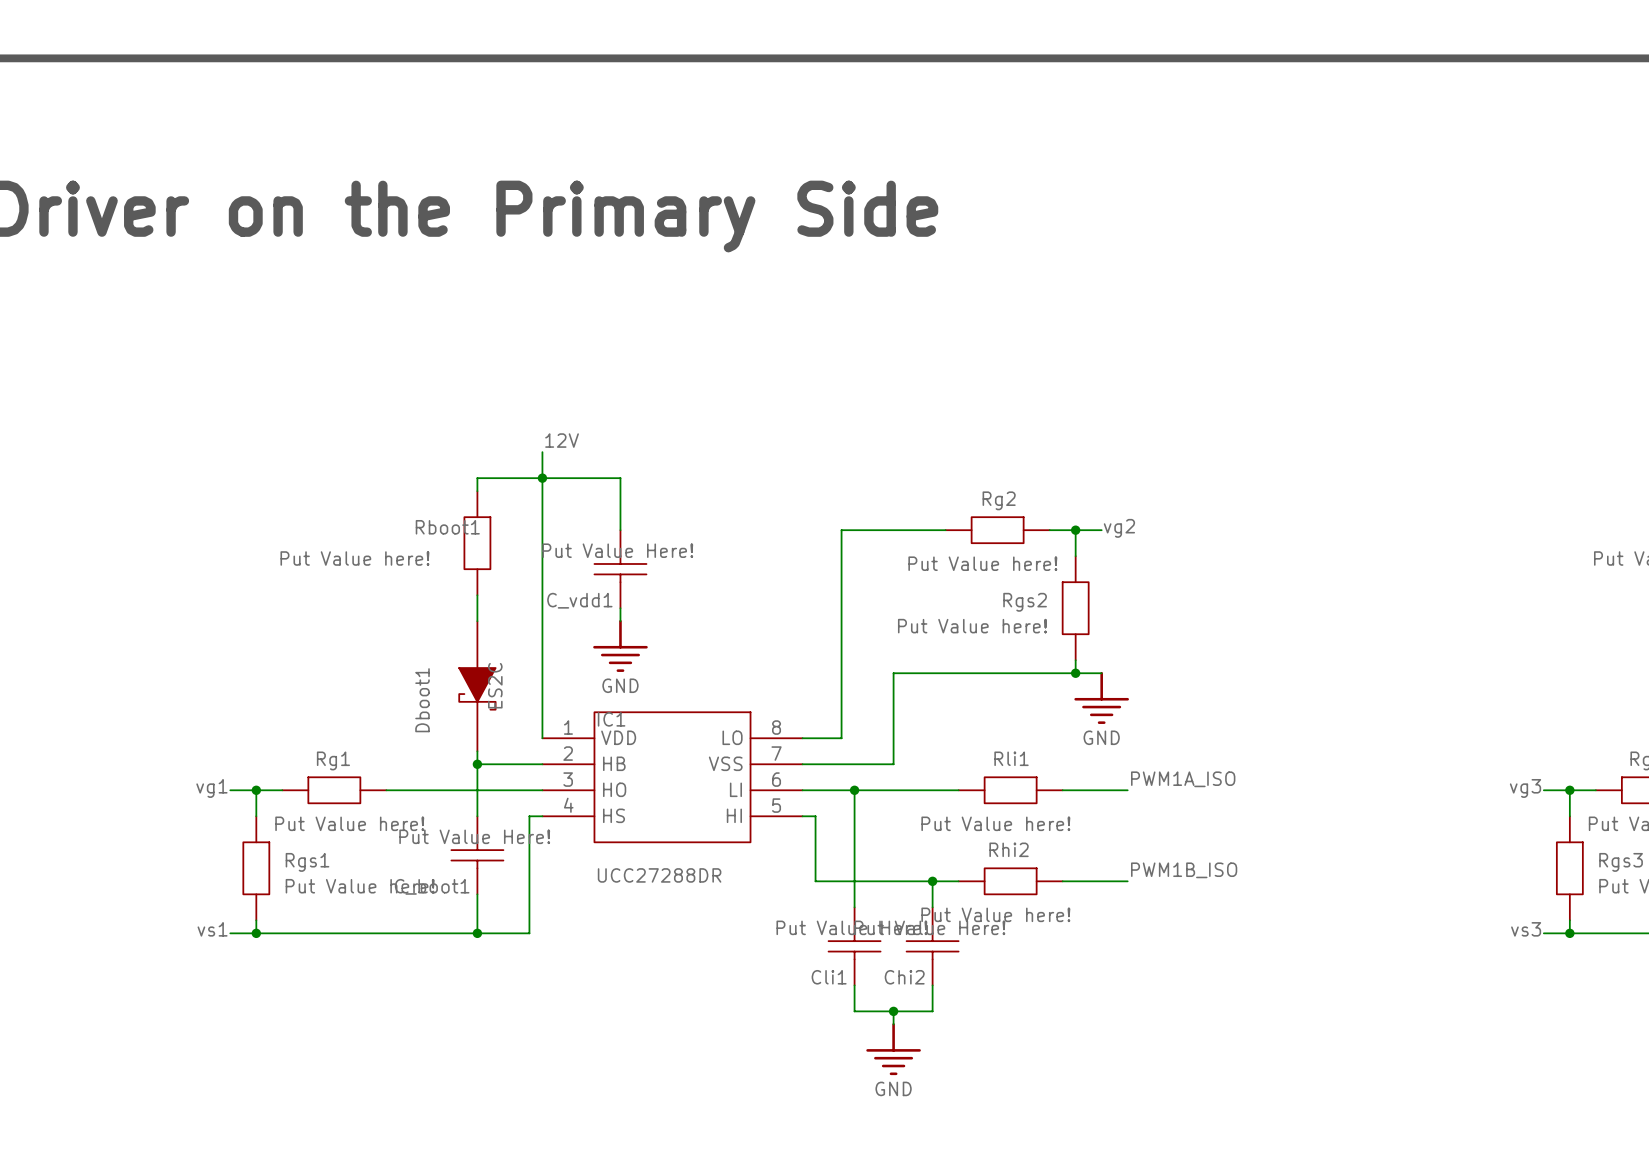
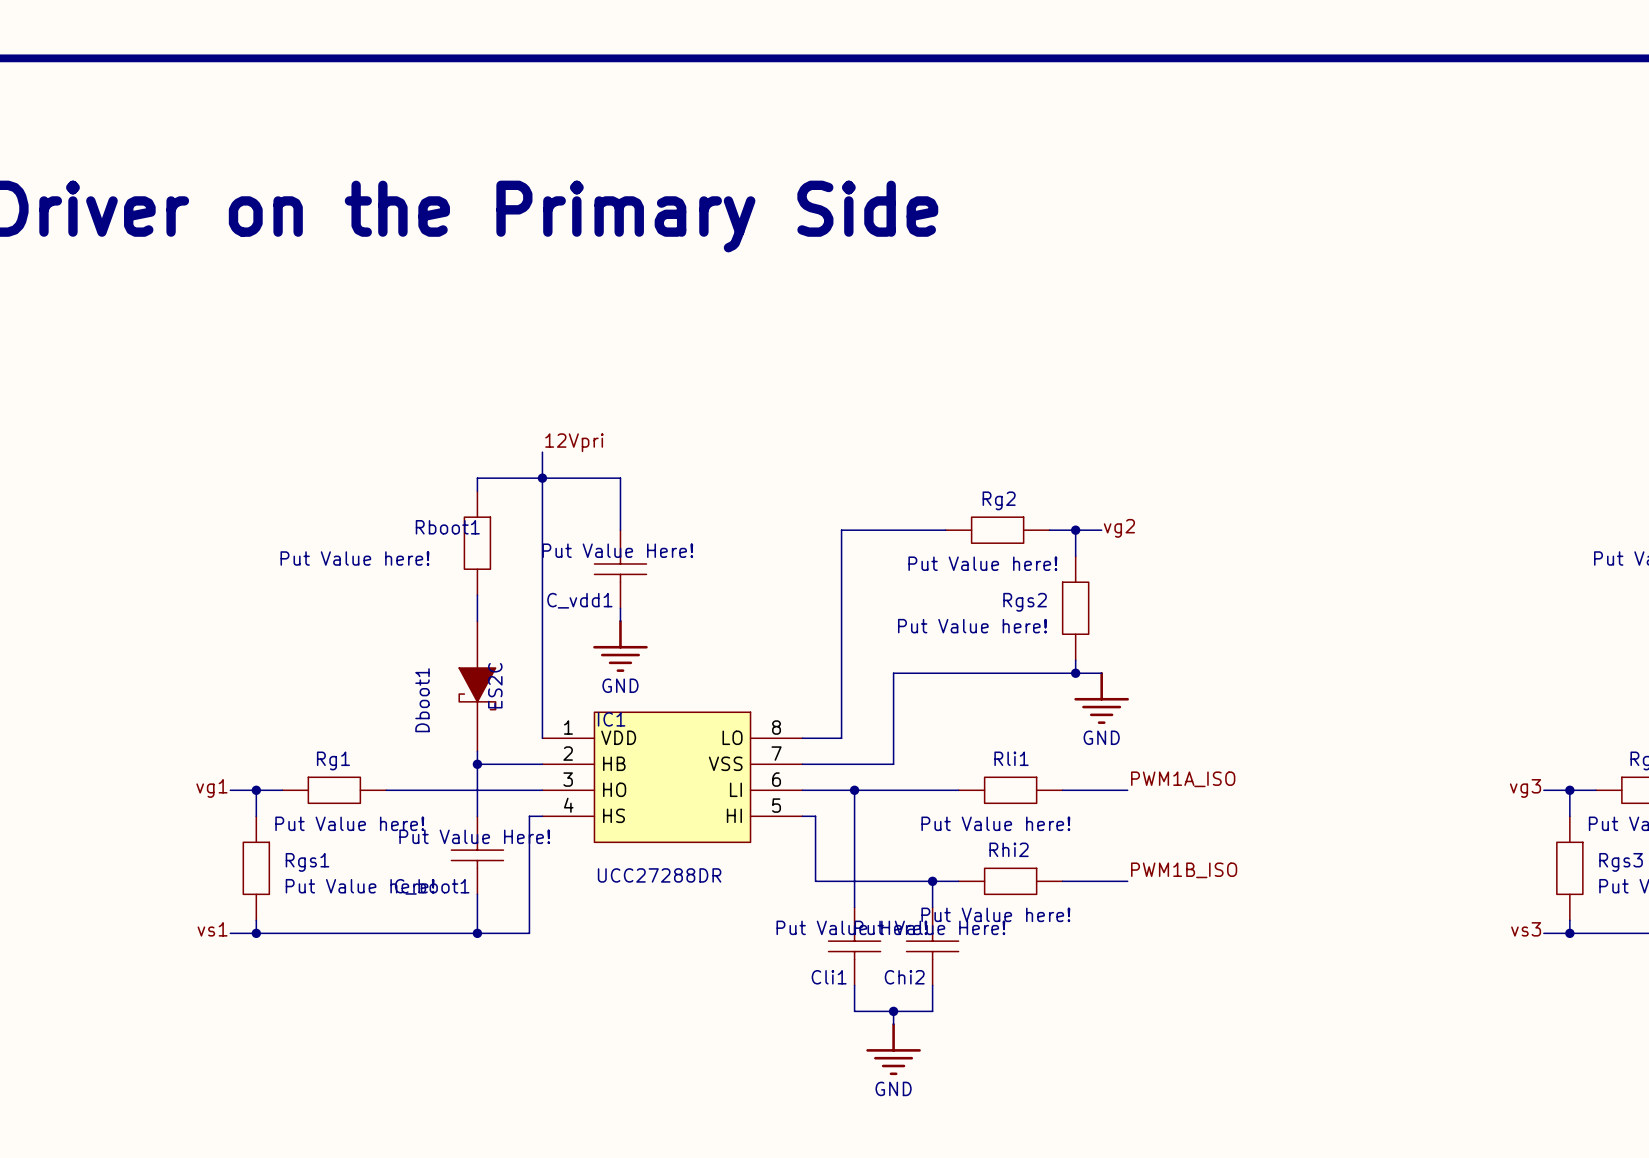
label: 12V (562, 440) -> 12Vpri (574, 442)

